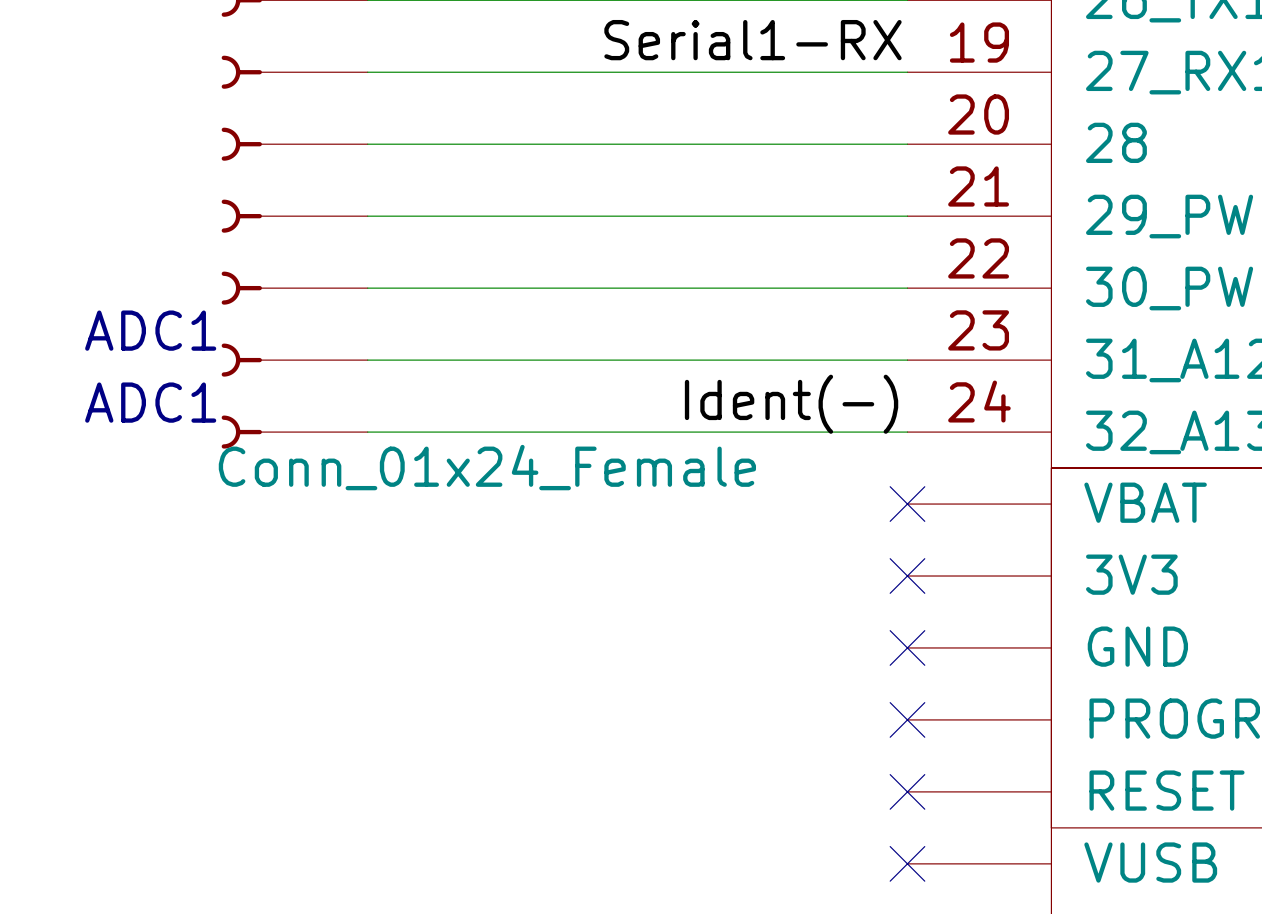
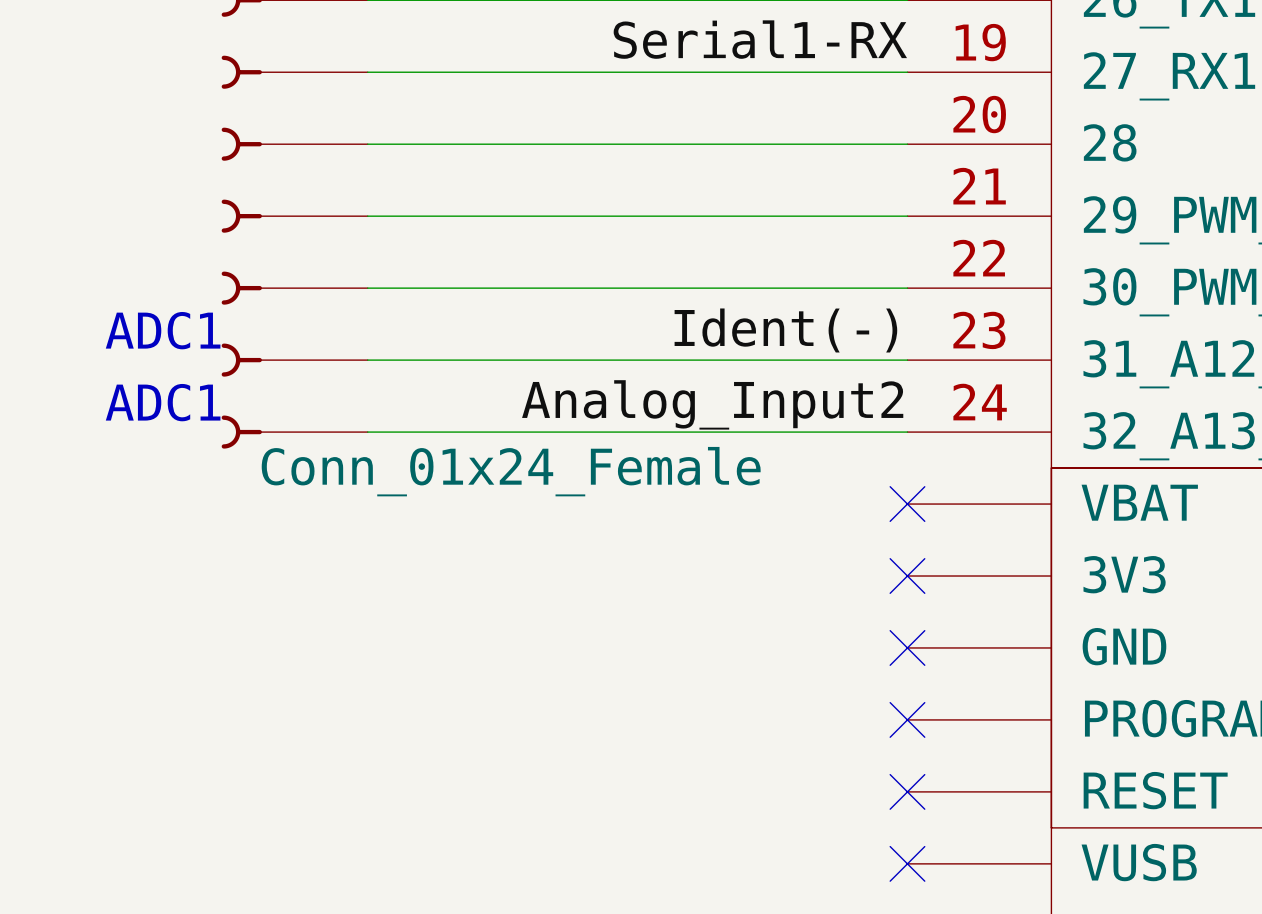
label: none -> Ident(-) (785, 330)
label: Ident(-) (791, 404) -> Analog_Input2 (712, 404)

